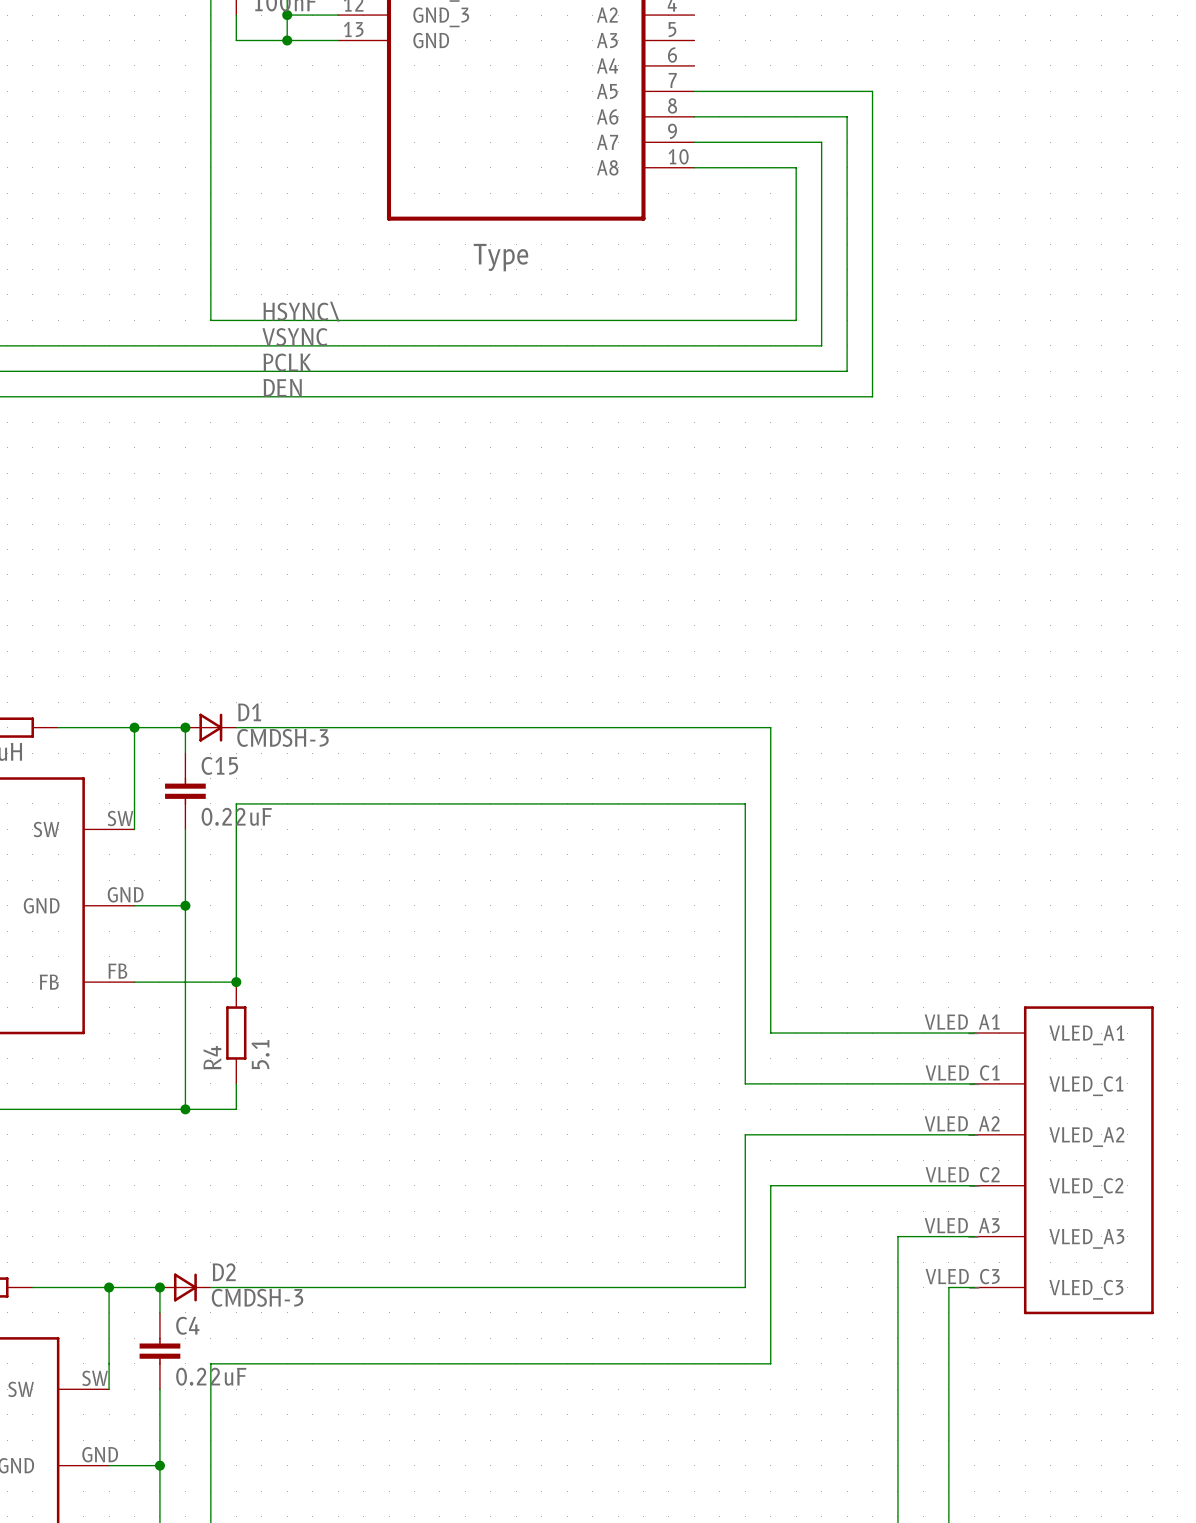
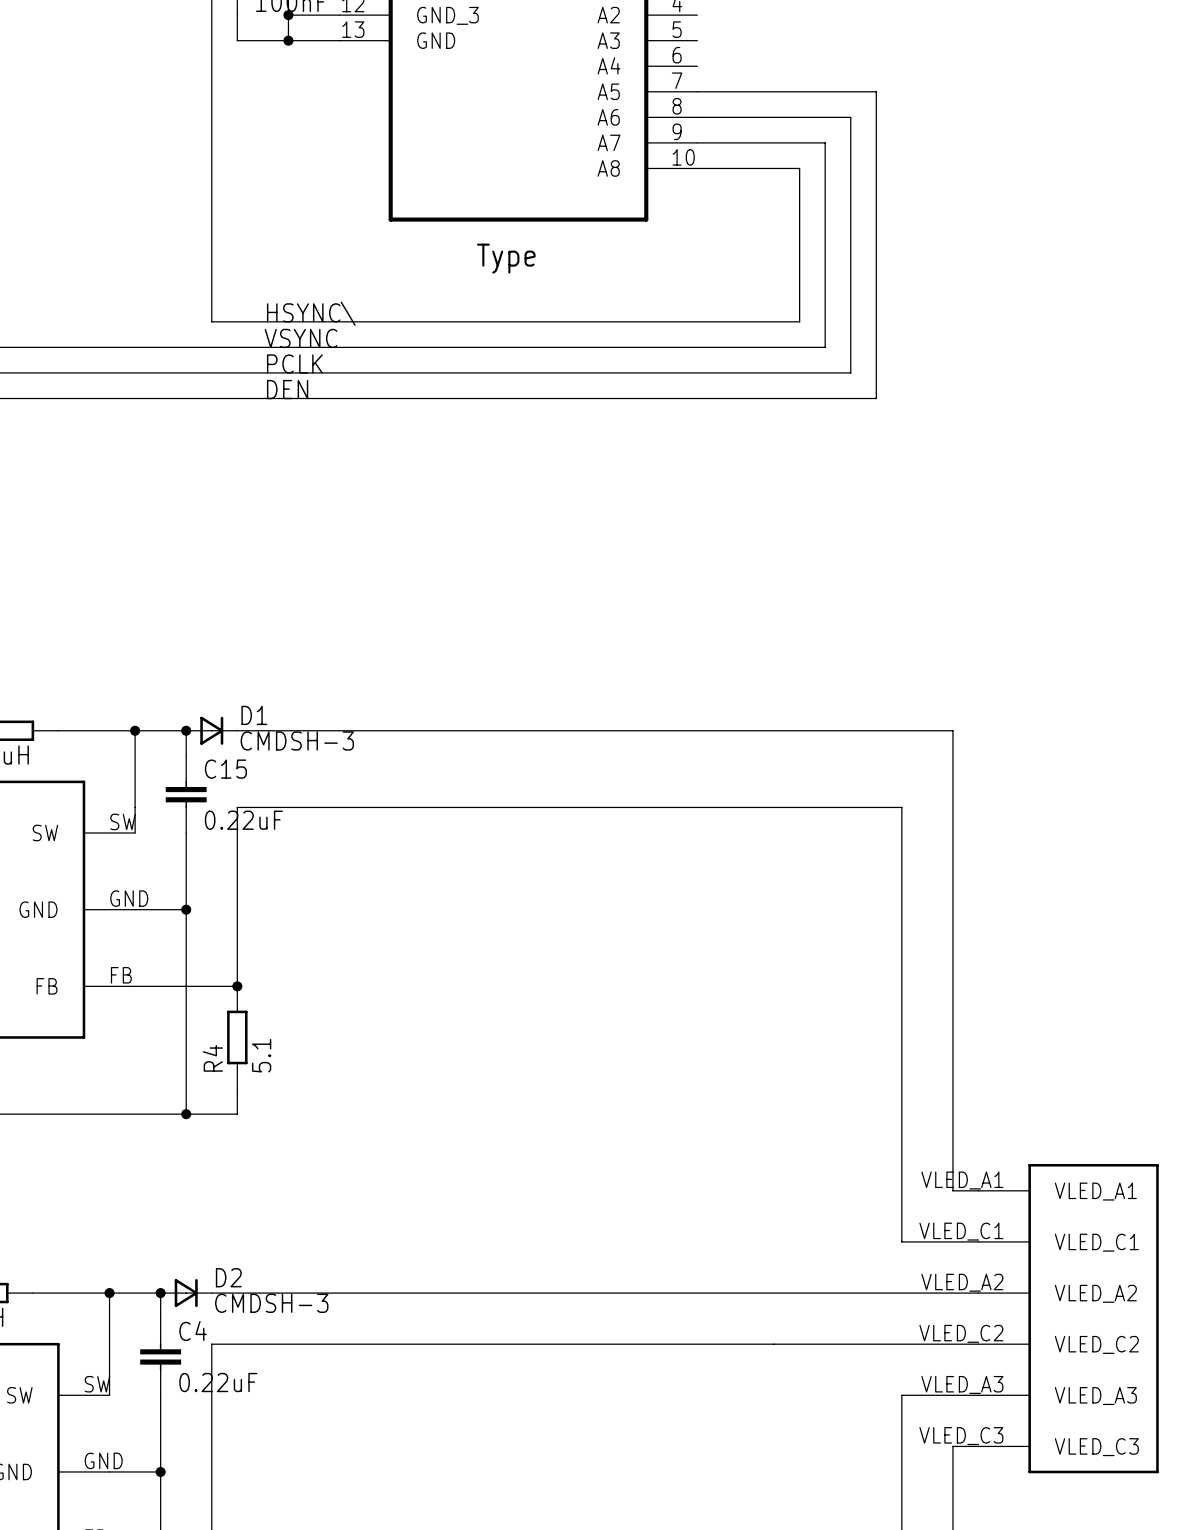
wire: (770, 727) (770, 1033) (974, 1033) -> (774, 730) (952, 730) (952, 1190)
wire: (745, 803) (745, 1083) (974, 1083) -> (748, 807) (901, 807) (901, 1241)
wire: (974, 1134) (745, 1134) (745, 1287) -> (952, 1293) (748, 1293)
part position: (1064, 1160) -> (1068, 1318)
wire: (948, 1185) (770, 1185) (770, 1363) (210, 1363) -> (978, 1344) (211, 1344) (211, 1369)
wire: (897, 1236) (897, 1389) -> (978, 1395) (901, 1395)
wire: (948, 1287) (948, 1440) -> (978, 1446) (952, 1446)

